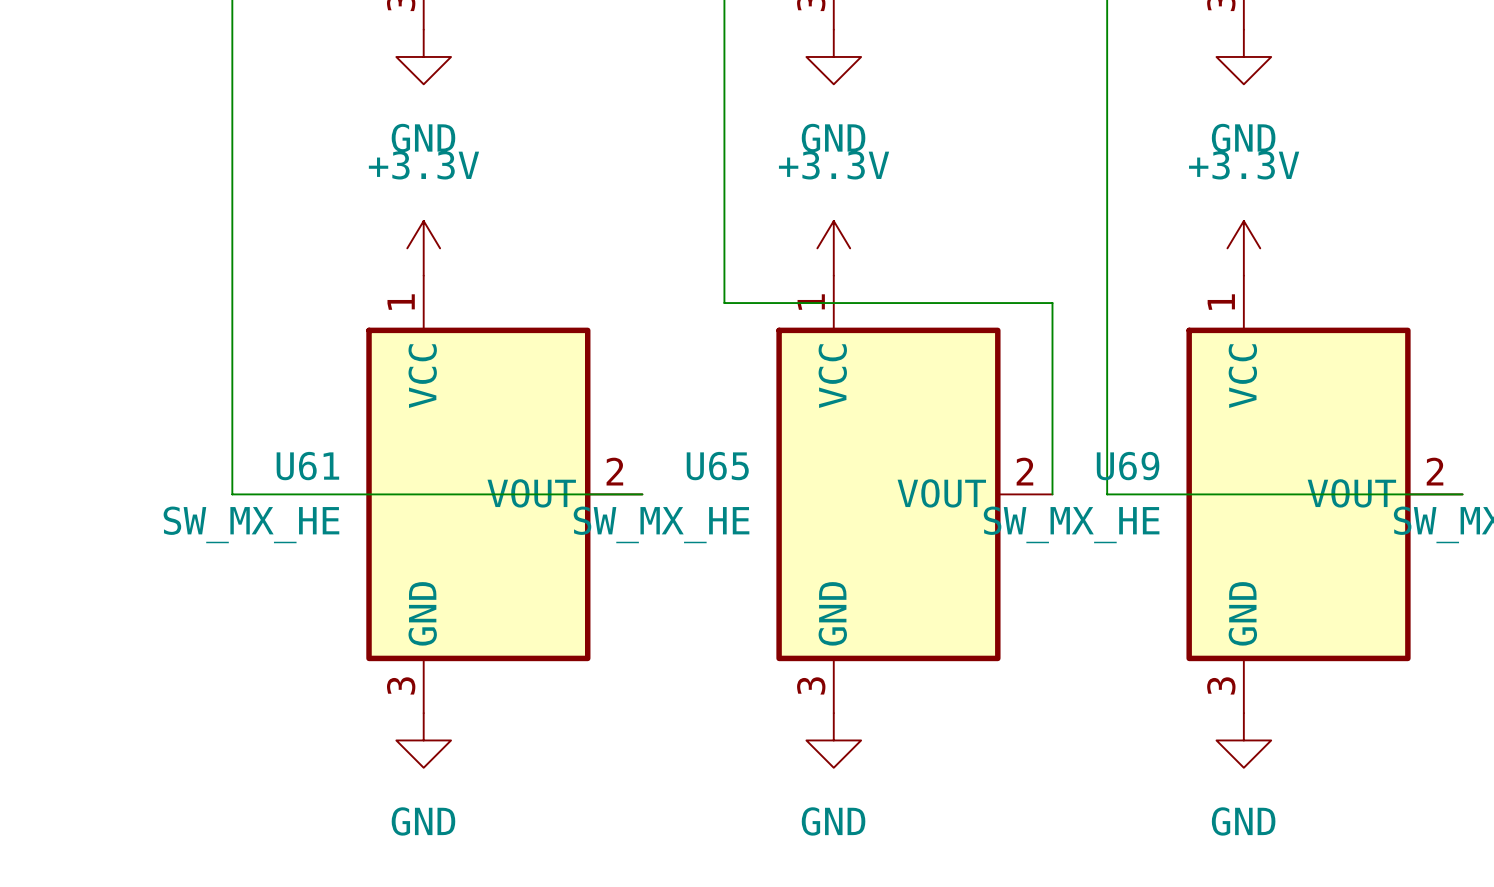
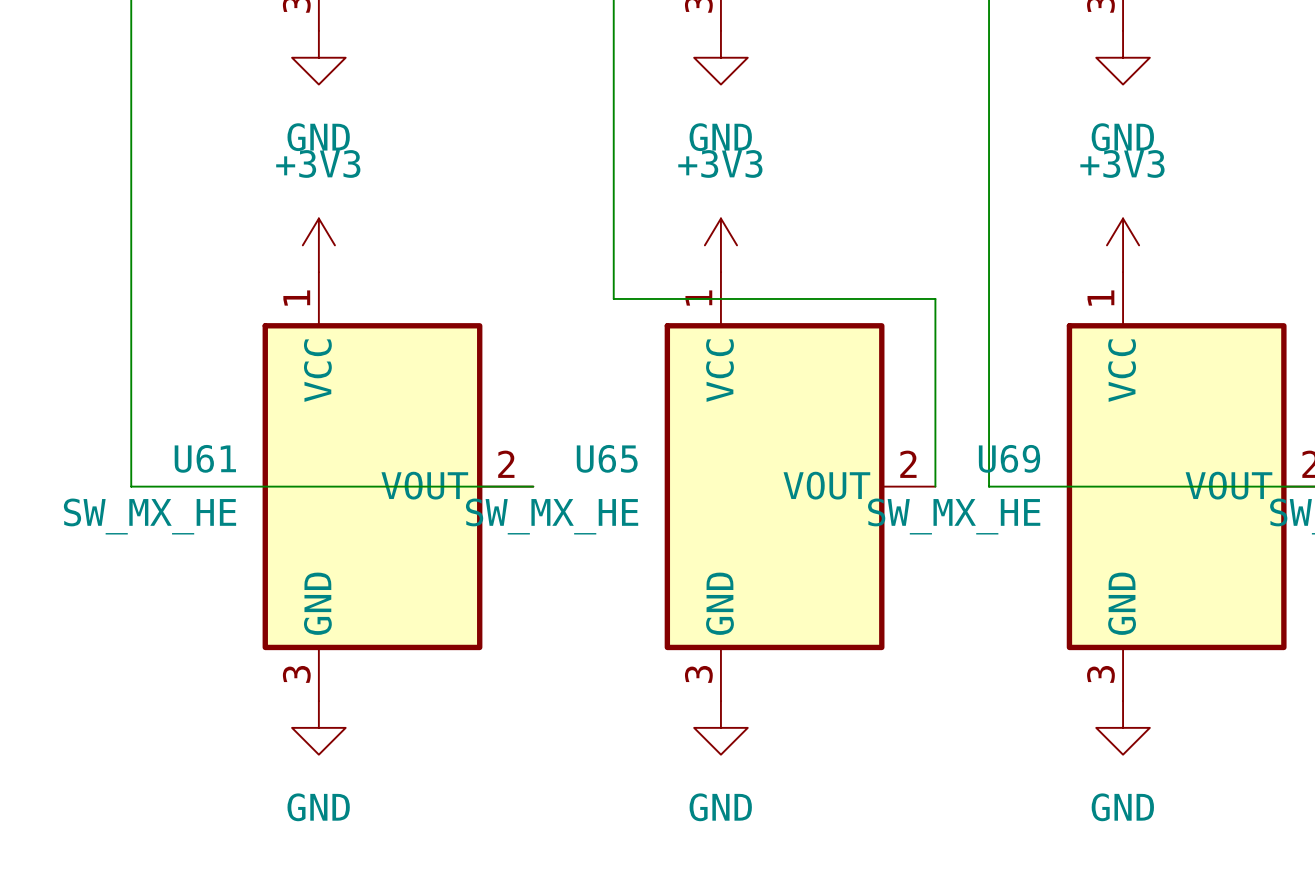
power symbol: +3.3V (423, 248) -> +3V3 (318, 245)
power symbol: +3.3V (833, 248) -> +3V3 (720, 245)
power symbol: +3.3V (1243, 248) -> +3V3 (1123, 245)

